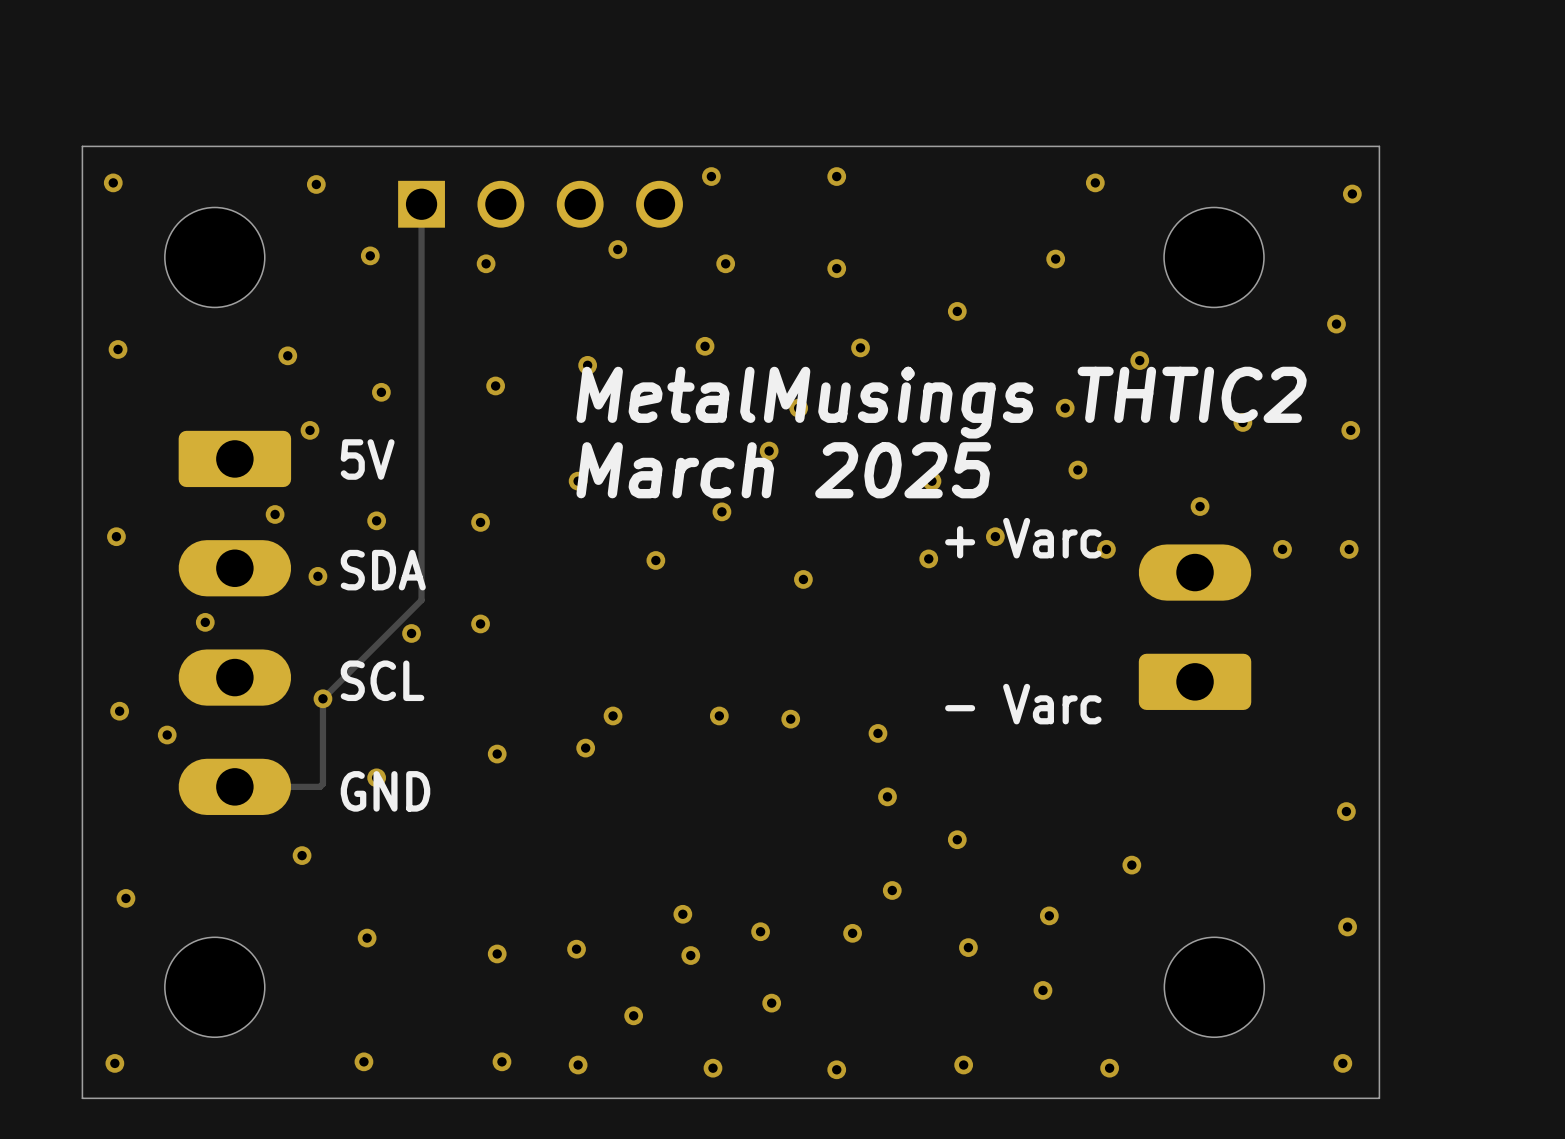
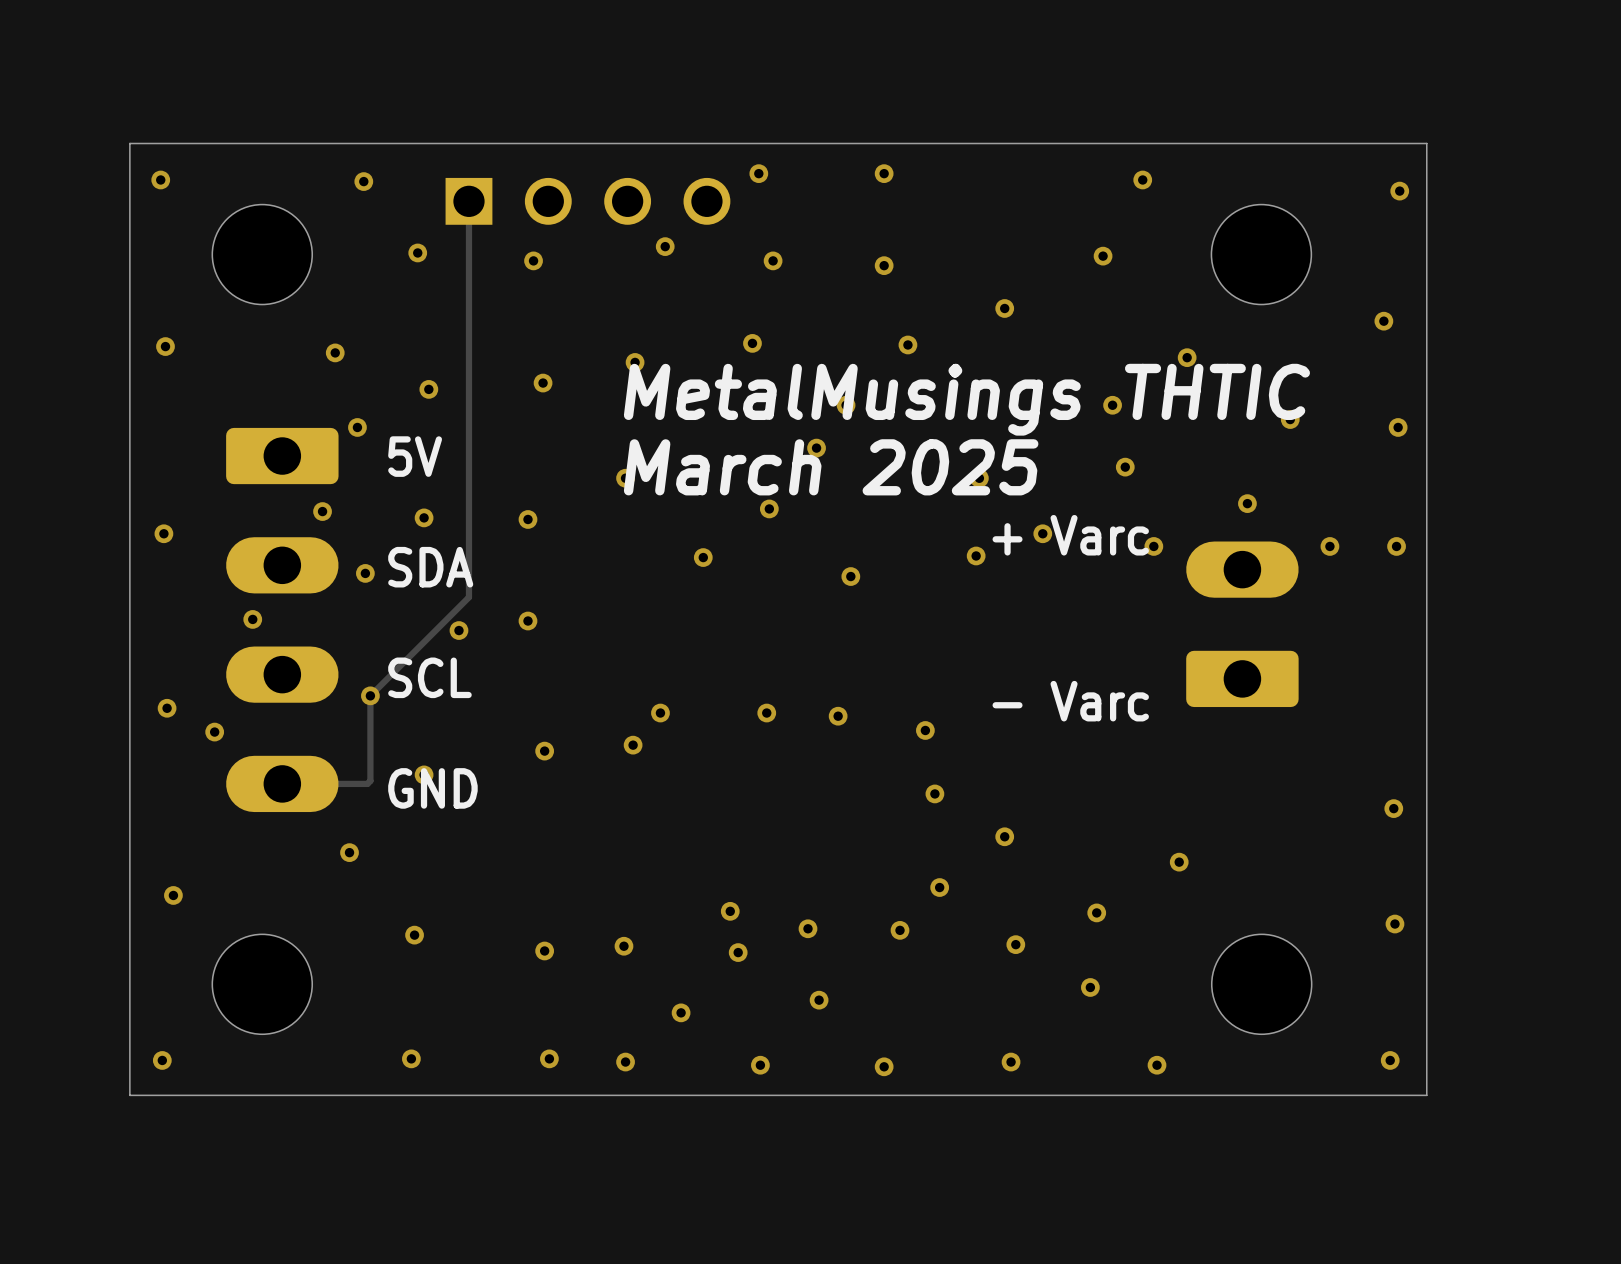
text: MetalMusings THTIC2 (941, 402) -> MetalMusings THTIC (966, 399)

